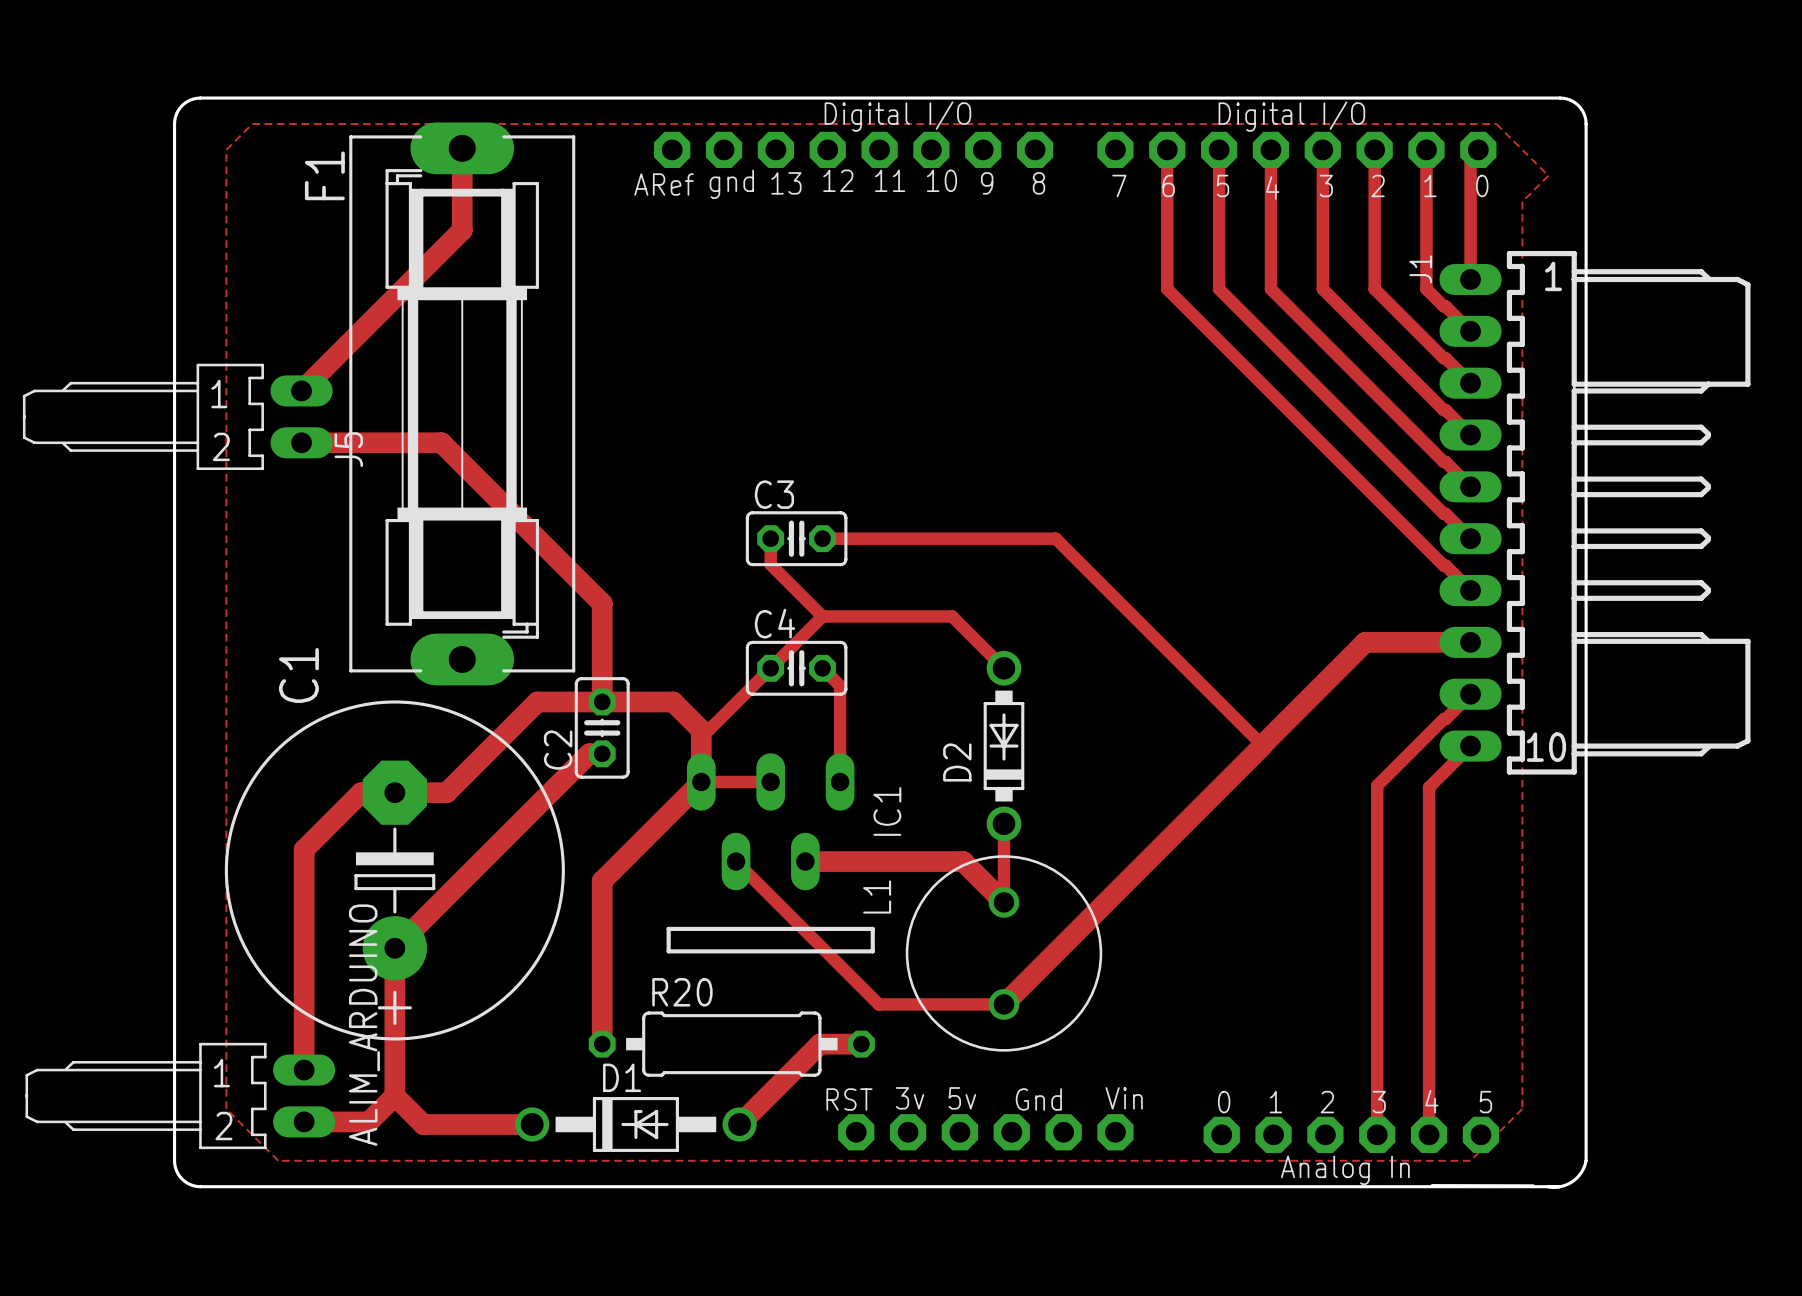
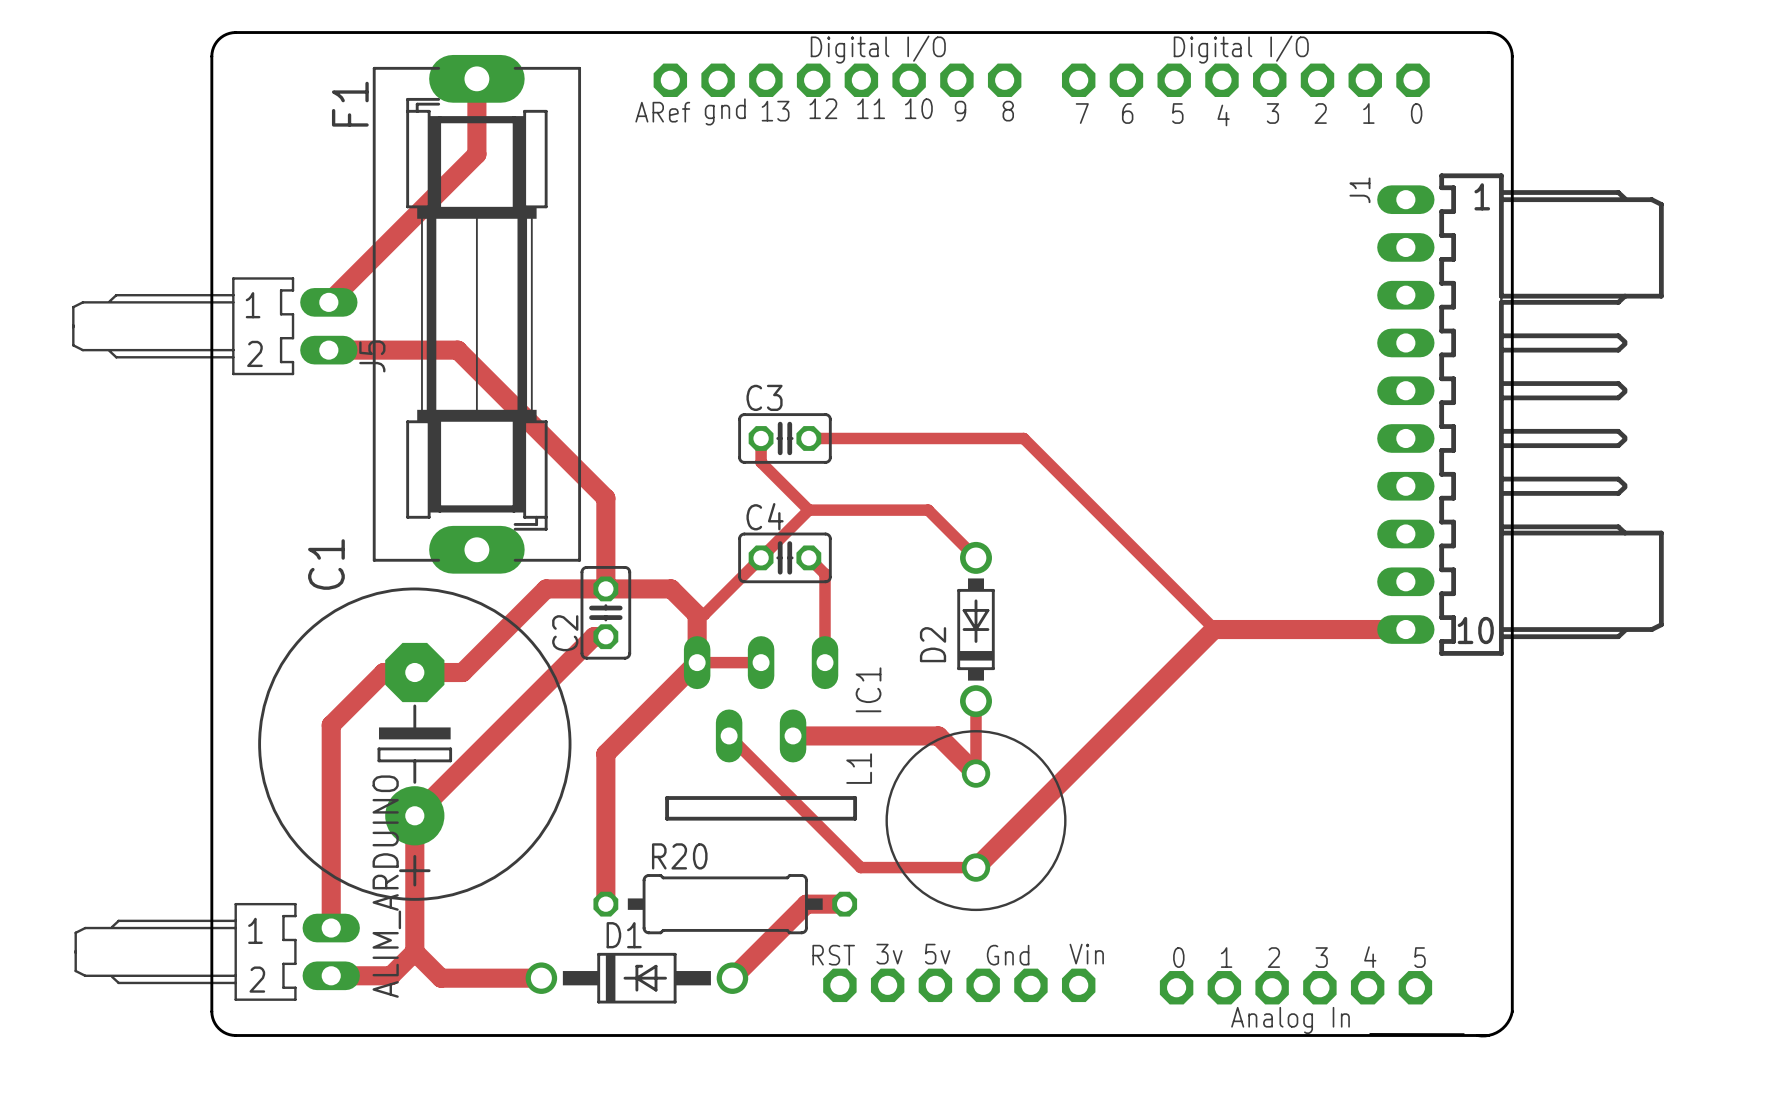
zone outline: (252, 123) (1496, 123) (1548, 175) (1522, 201) (1522, 1108) (1470, 1160) (278, 1160) (226, 1108) (226, 149) (252, 123) -> none
track: (1167, 149) (1167, 289) (1470, 590) -> none
track: (1219, 149) (1219, 289) (1470, 538) -> none
track: (1270, 149) (1270, 289) (1470, 486) -> none
track: (1322, 149) (1322, 289) (1470, 435) -> none
track: (1374, 149) (1374, 289) (1470, 383) -> none
track: (1426, 149) (1426, 289) (1470, 331) -> none
track: (1478, 149) (1470, 157) (1470, 279) -> none
track: (1470, 642) (1365, 642) (1262, 745) -> (1405, 629) (1214, 629)
track: (1470, 694) (1377, 785) (1377, 1134) -> none
track: (1470, 746) (1429, 787) (1429, 1134) -> none

